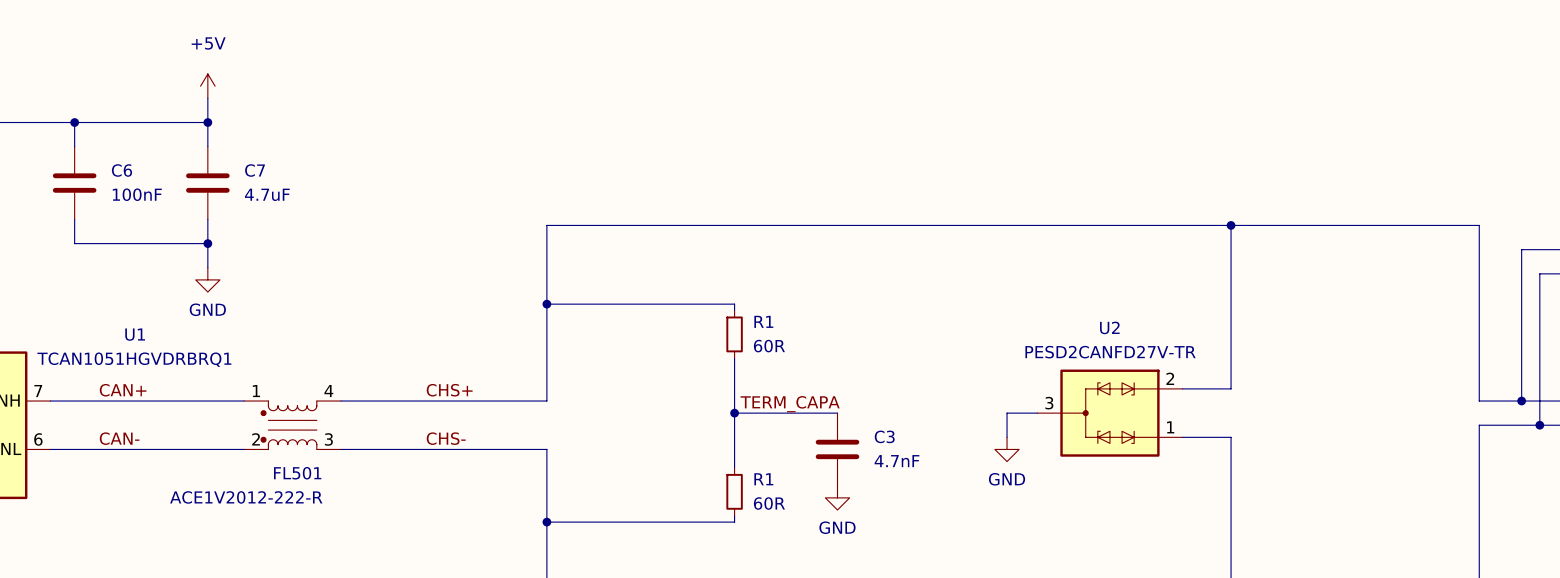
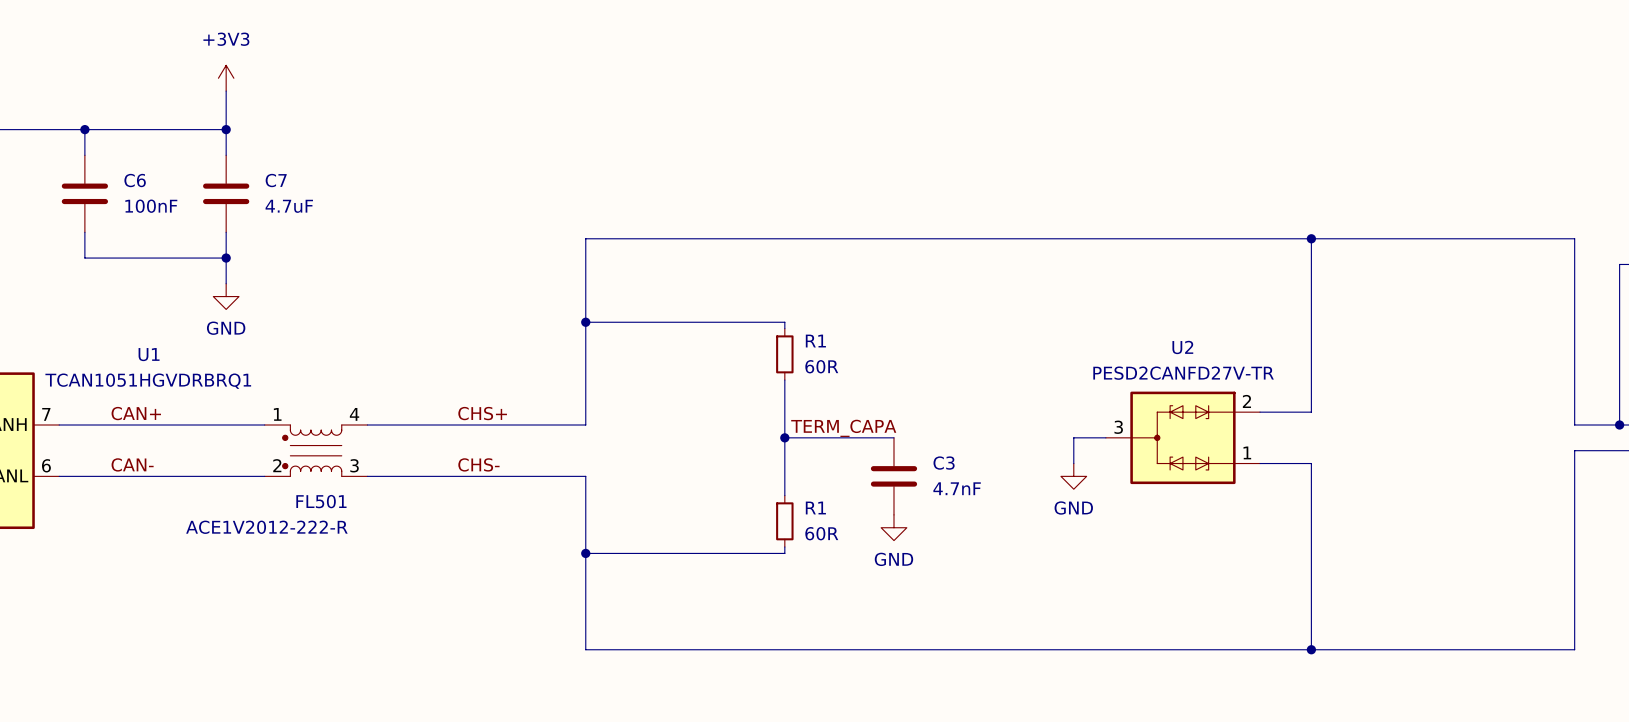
power symbol: none -> +3V3 (226, 78)
power symbol: +5V (207, 86) -> none

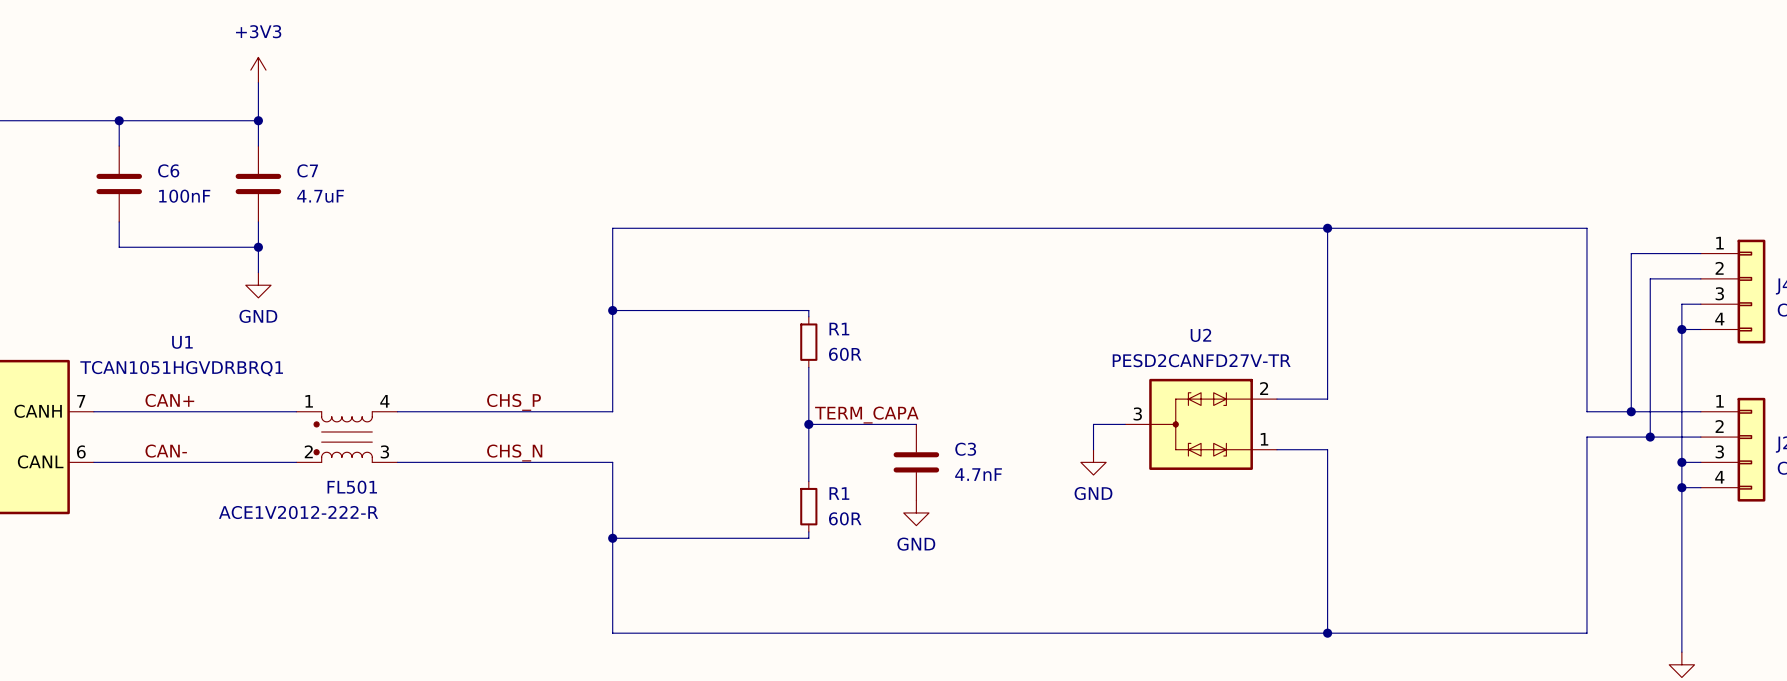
label: CHS+ (482, 413) -> CHS_P (514, 402)
label: CHS- (478, 464) -> CHS_N (514, 453)

